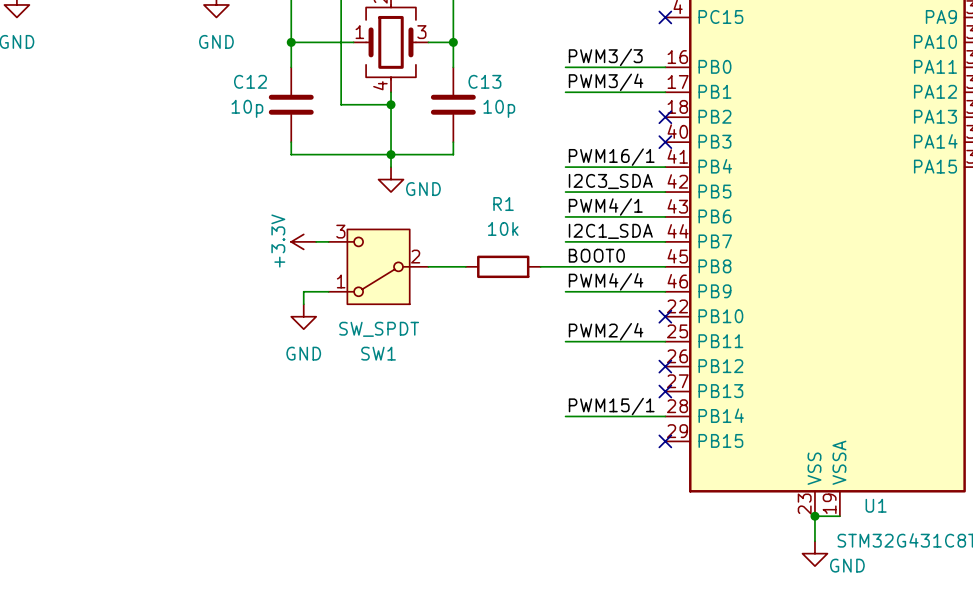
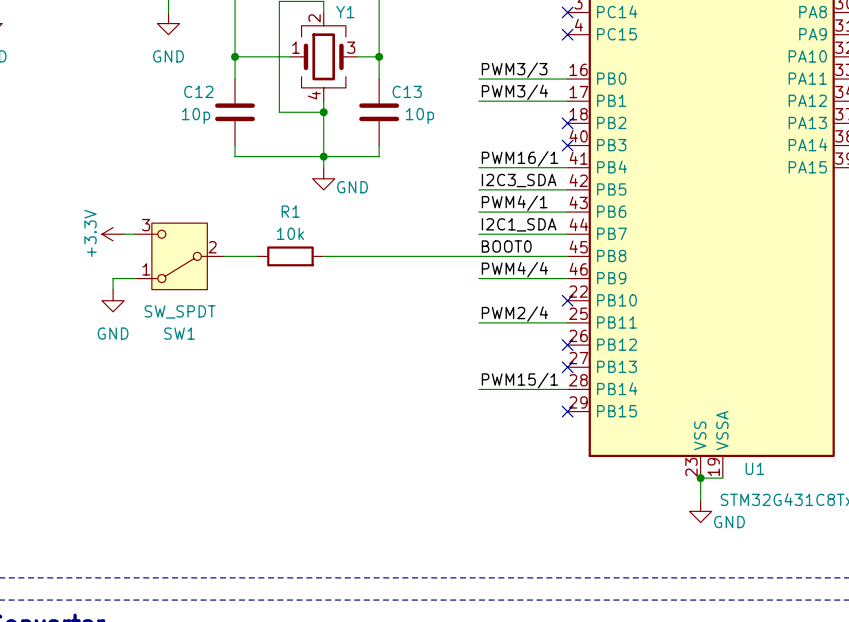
R1 name position: R1 (503, 204) -> R1 (290, 211)
R1 value position: 10k (503, 228) -> 10k (290, 233)
power symbol position: +3.3V (303, 241) -> +3.3V (113, 234)
wire: (316, 241) (328, 241) -> (124, 234) (135, 234)
wire: none -> (223, 256) (257, 256)
SW1 position: (378, 266) -> (179, 256)
wire: none -> (390, 256) (456, 256)
R1 position: (503, 266) -> (290, 256)
wire: (328, 291) (303, 291) (303, 304) -> (135, 278) (113, 278) (113, 289)
power symbol position: GND (303, 316) -> GND (113, 300)

